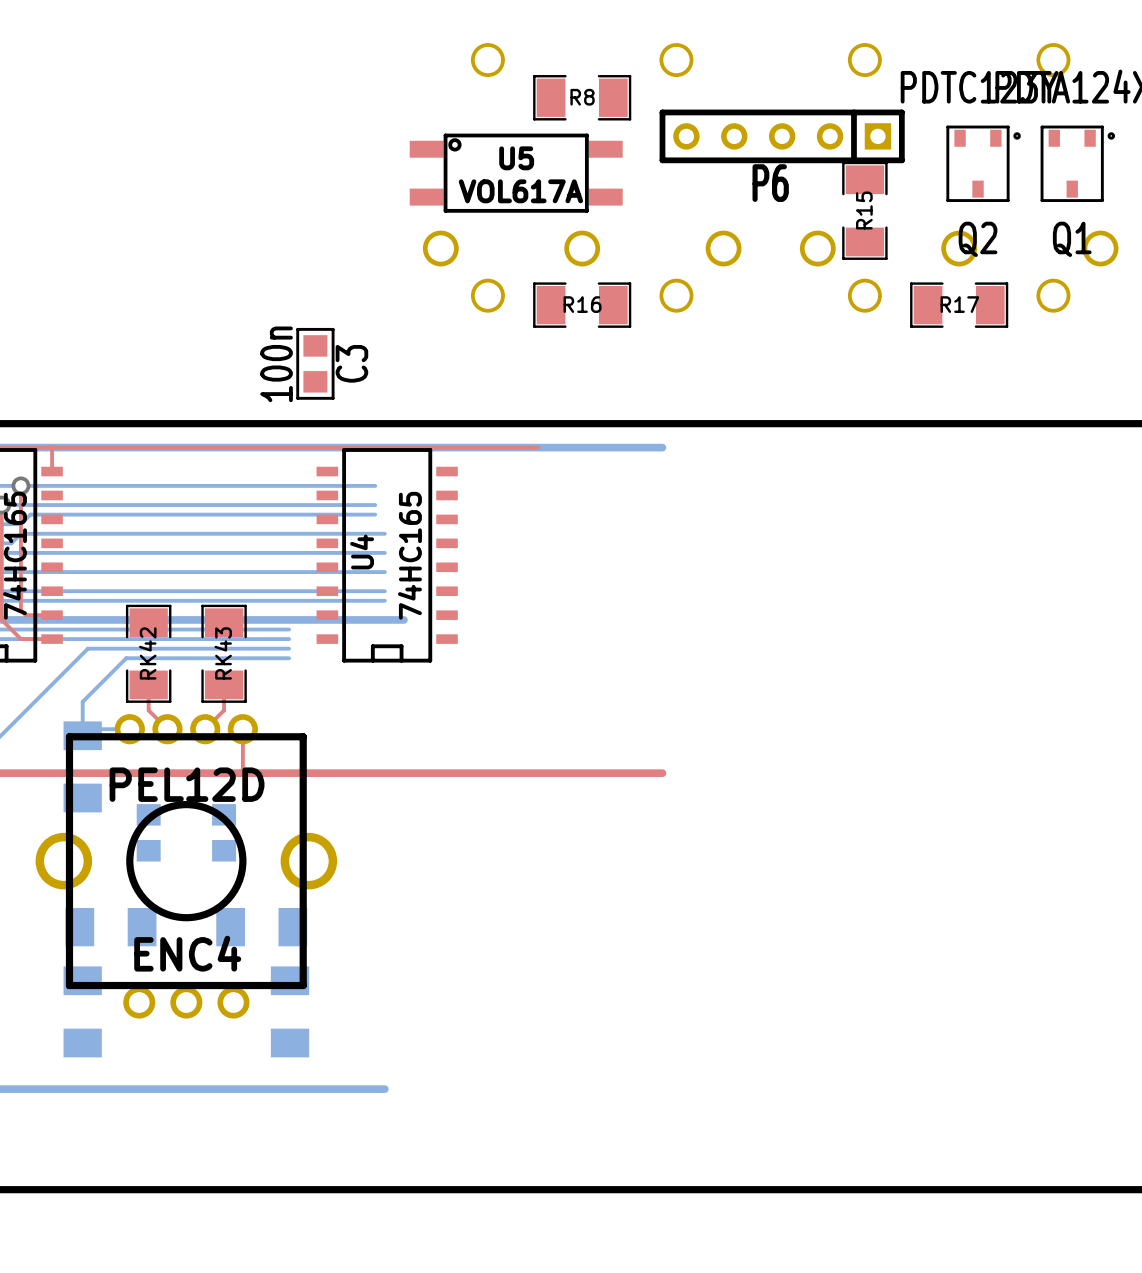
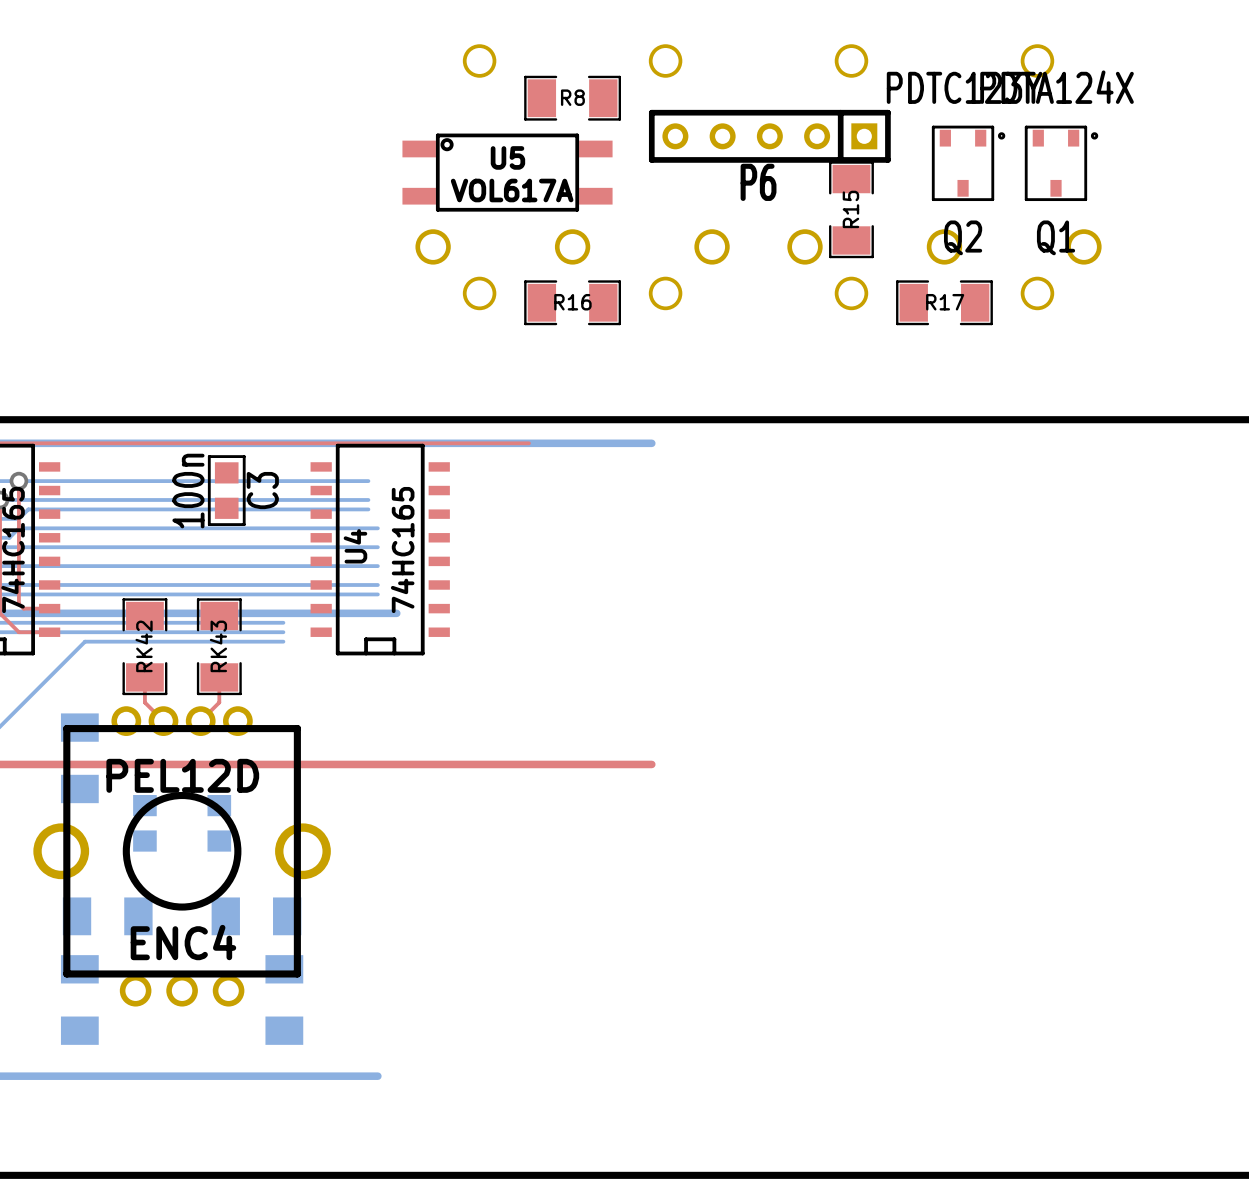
C3 position: (315, 363) -> (226, 490)
top track: (52, 447) (52, 471) -> none
bottom track: (289, 658) (126, 658) (82, 701) (82, 735) (89, 729) (129, 729) -> none
top track: (242, 729) (242, 773) (241, 773) -> none

